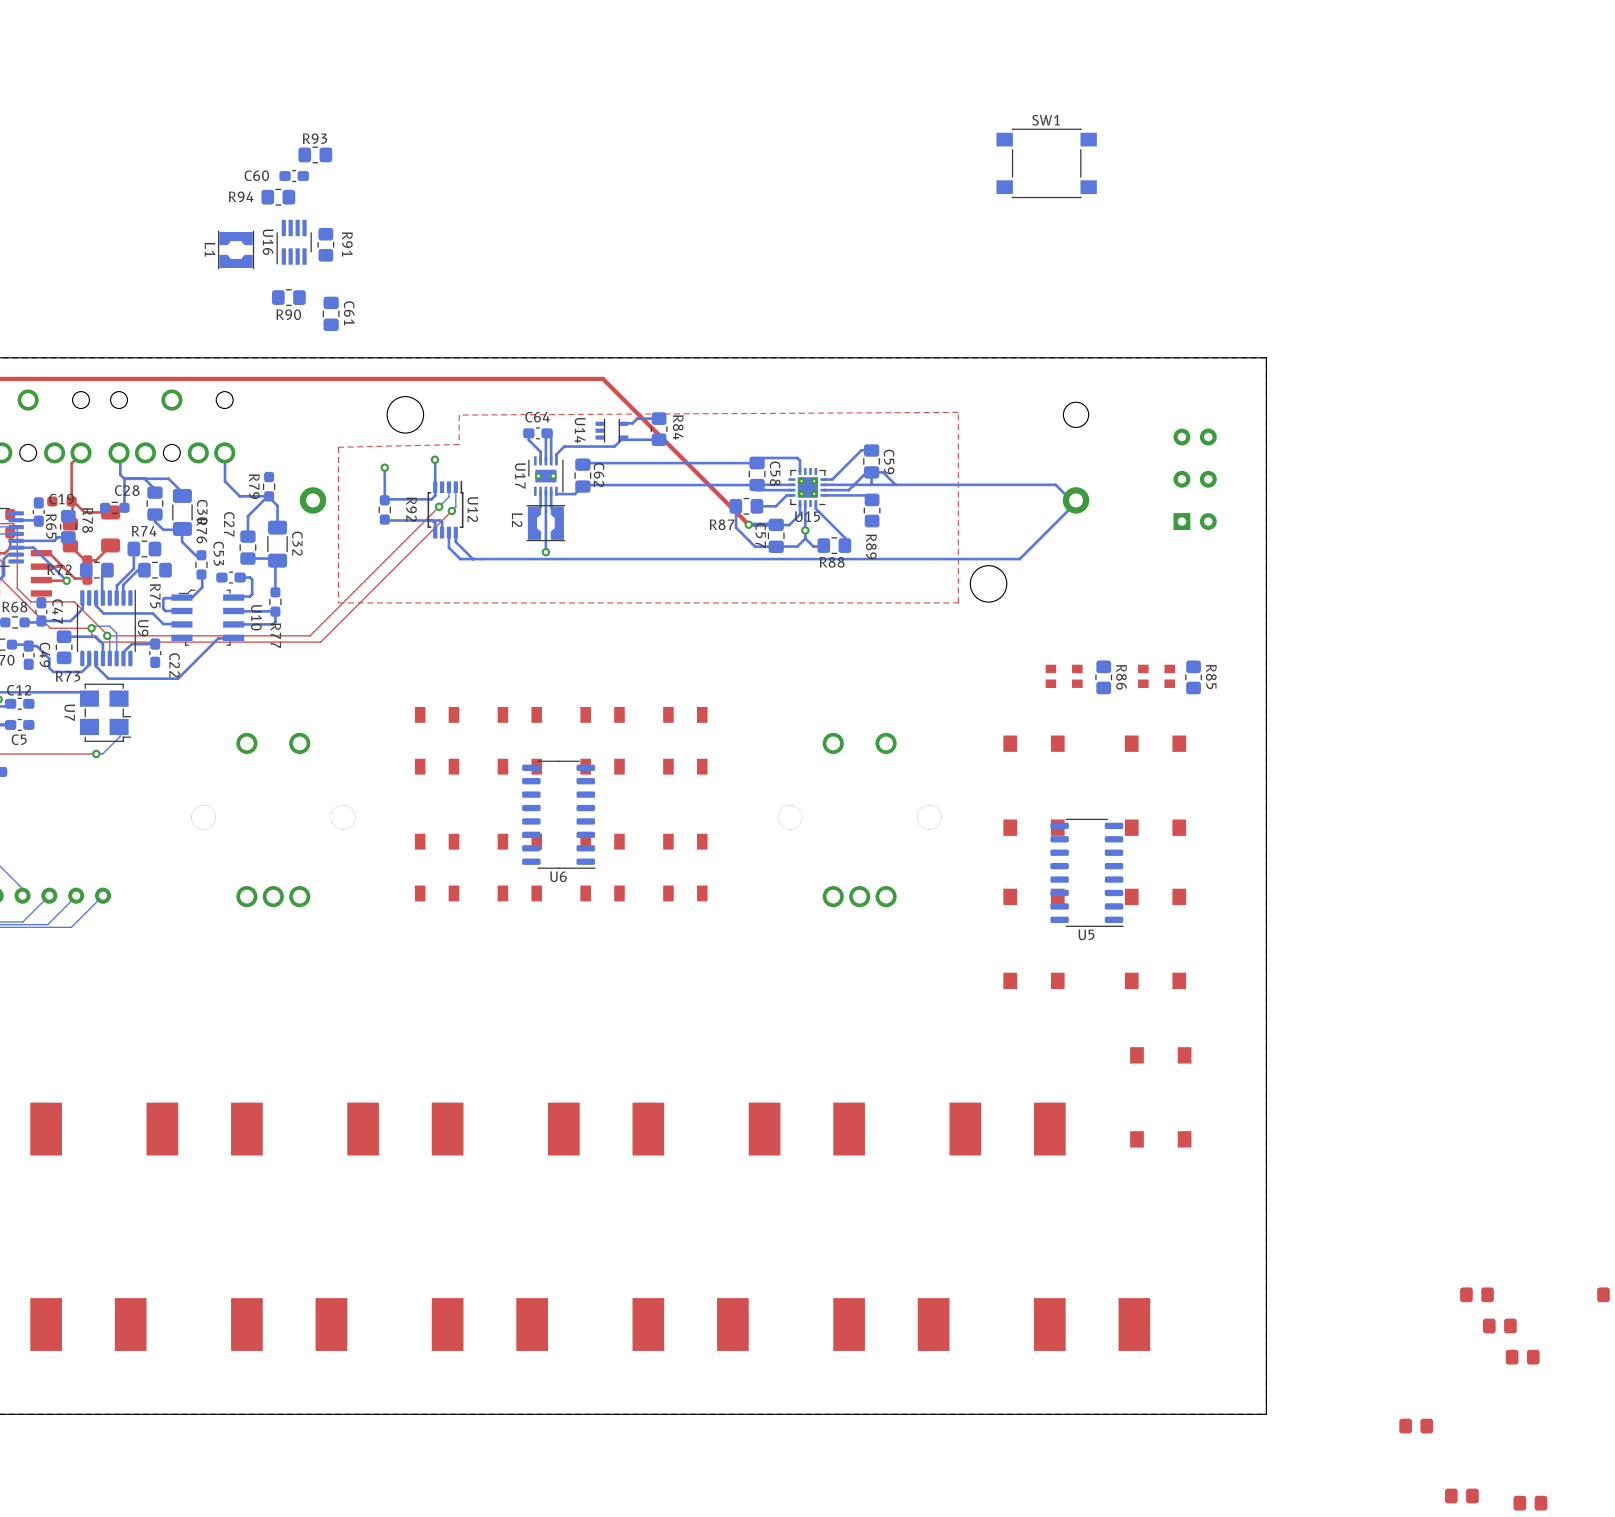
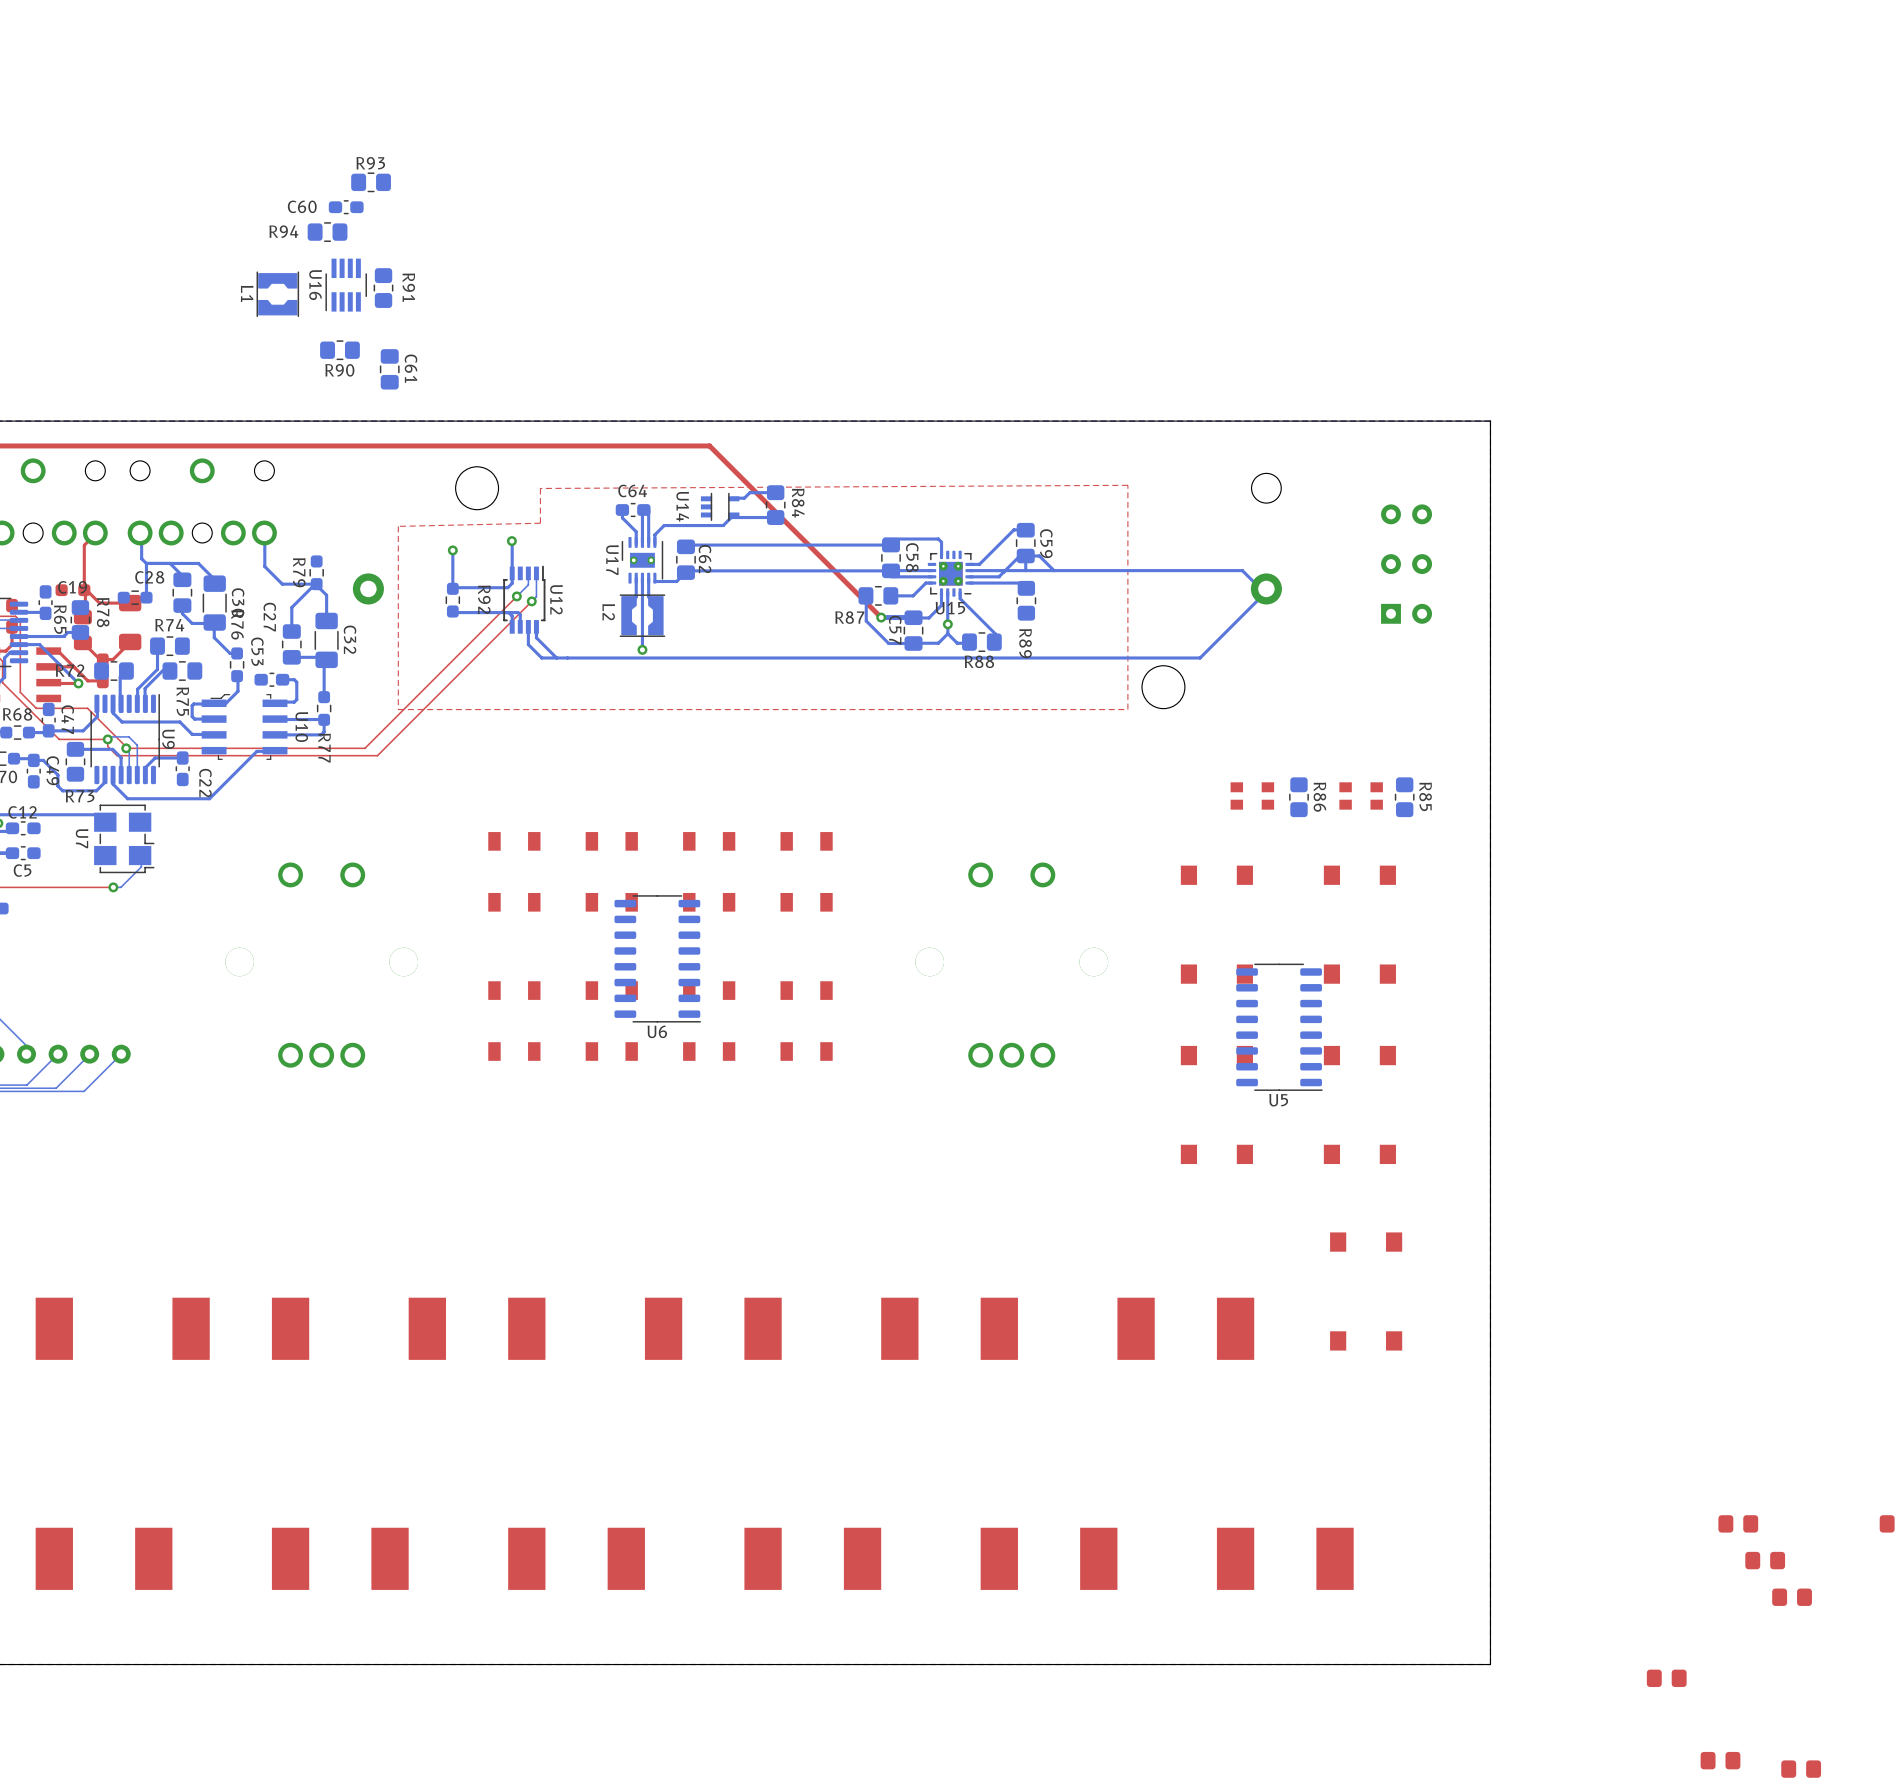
SW1: (1046, 163) -> none

